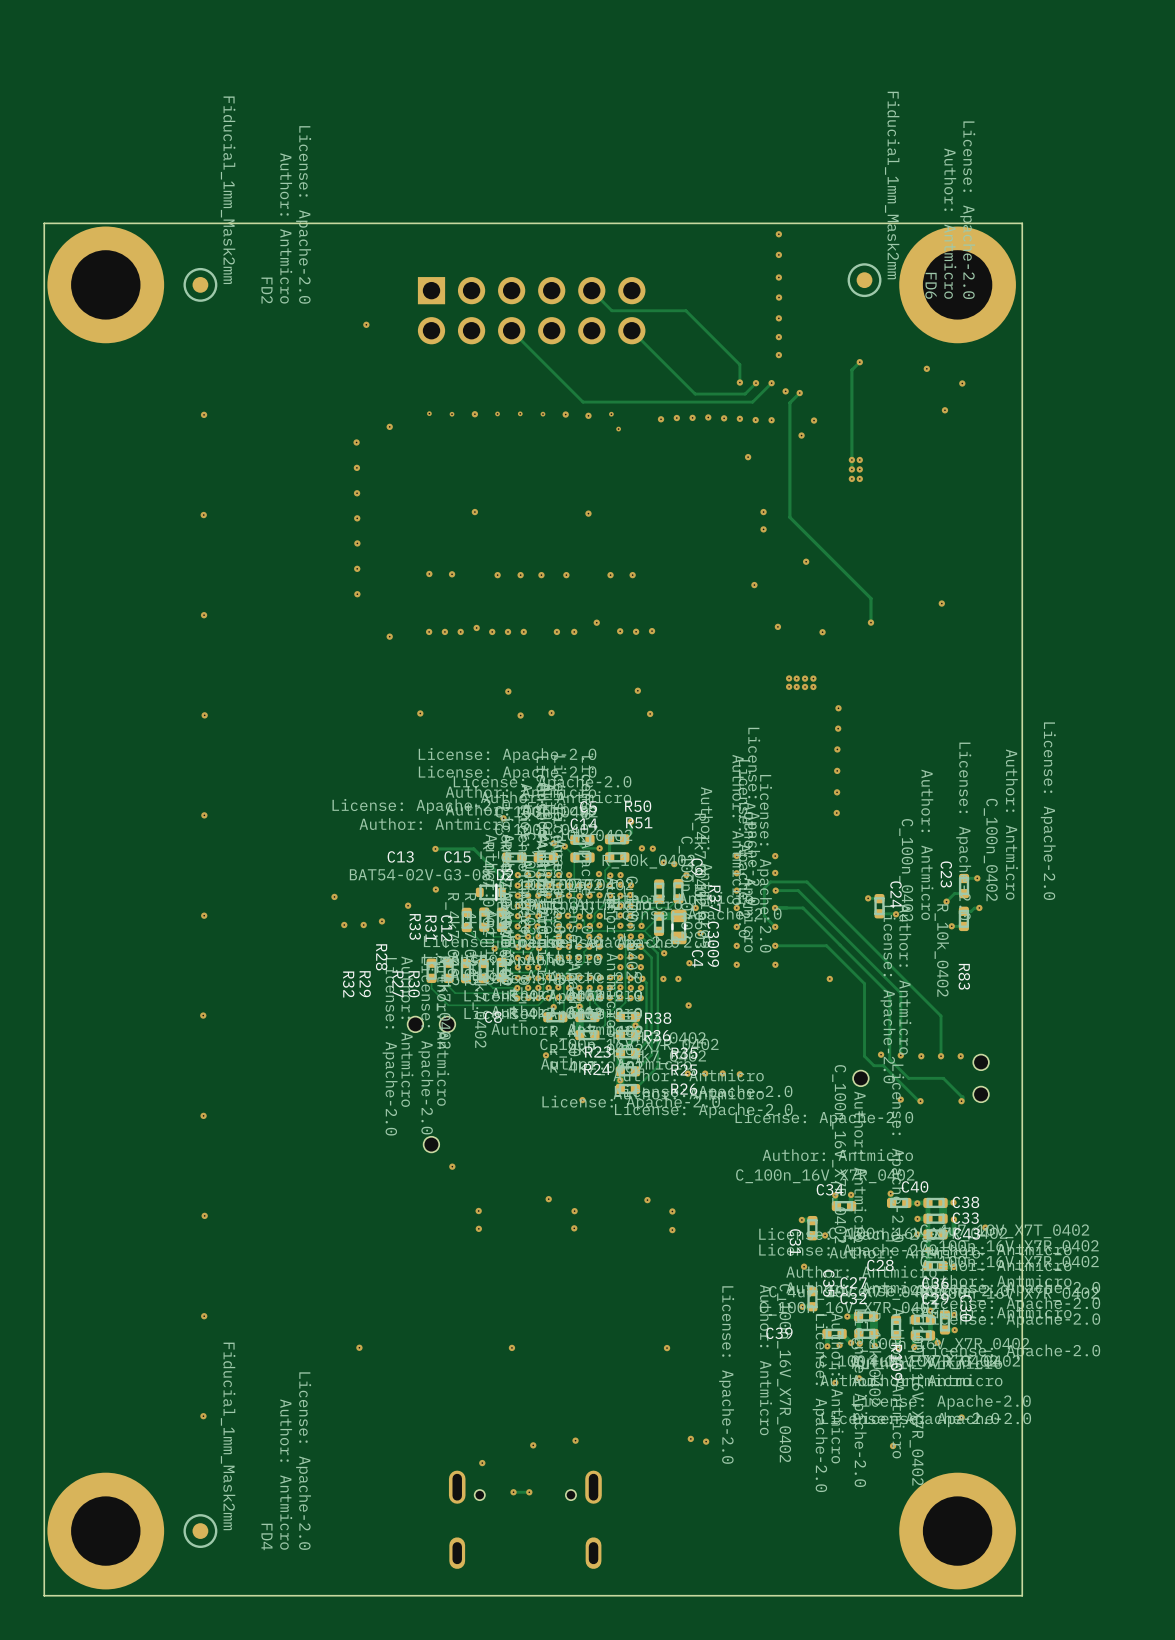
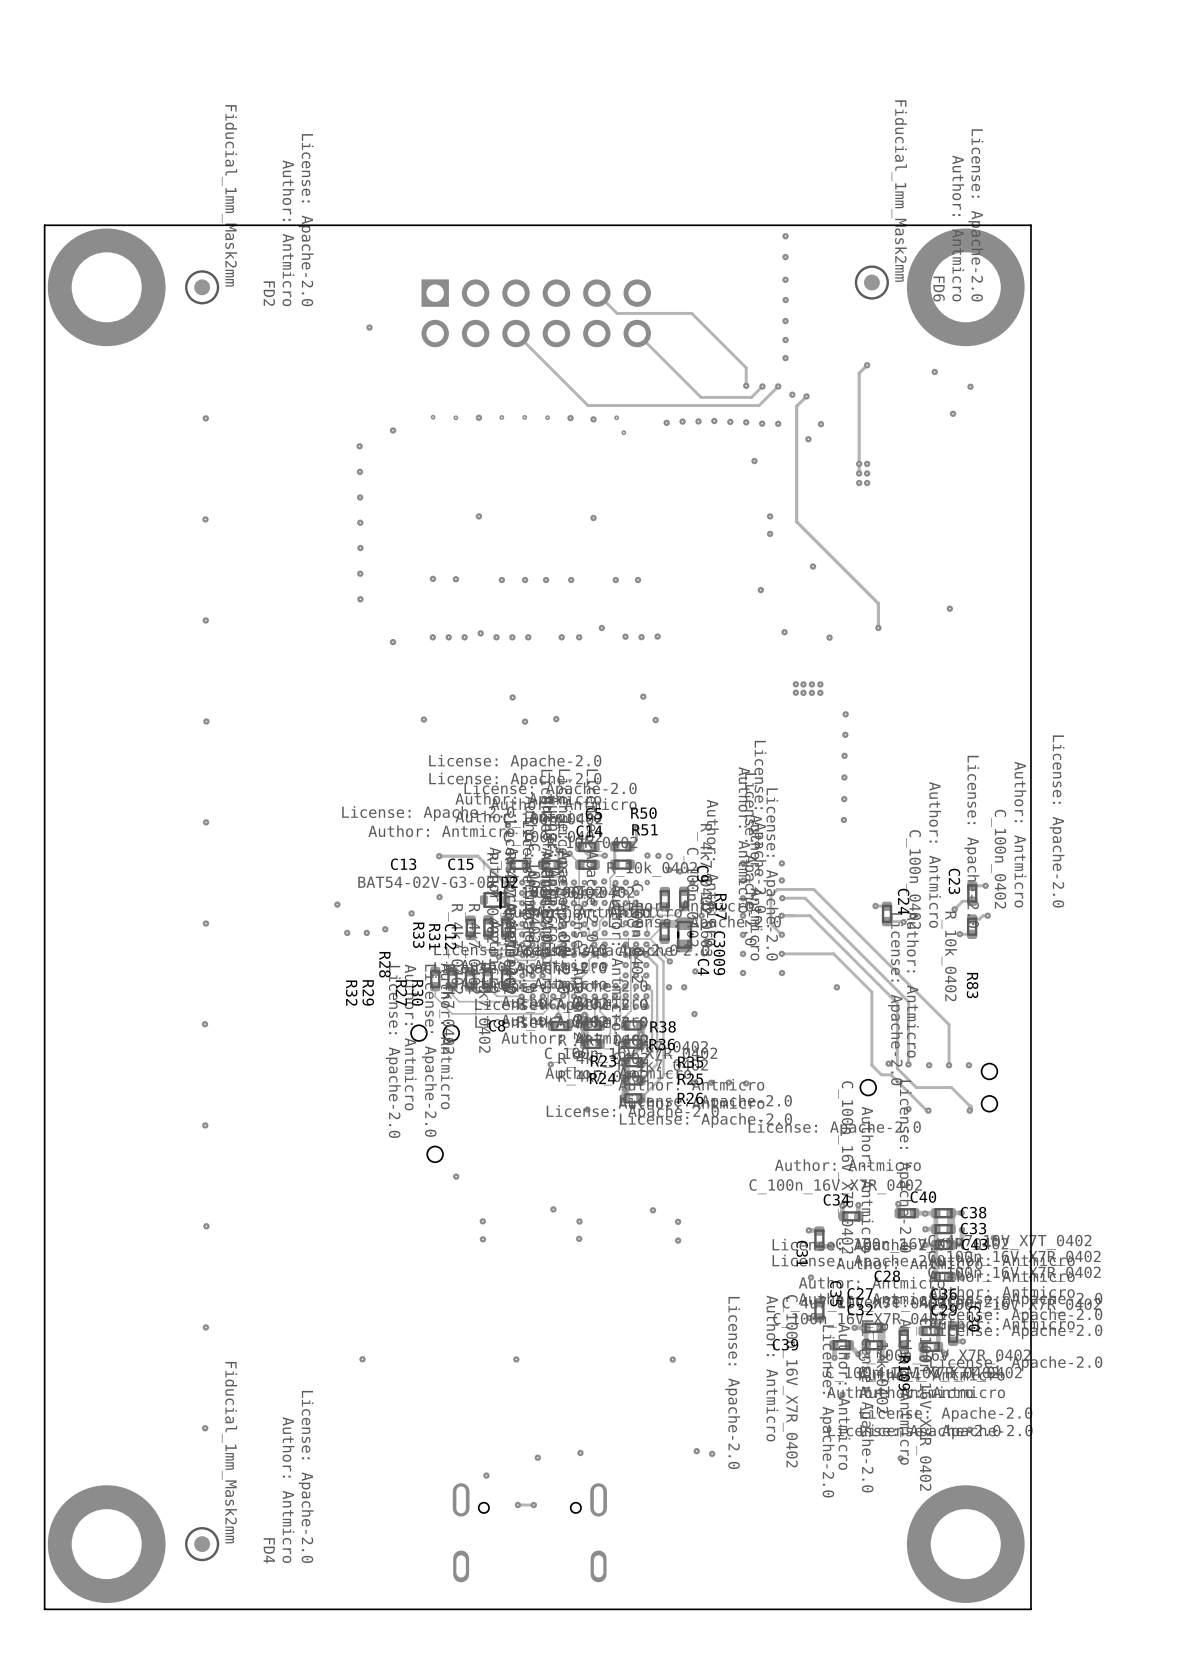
via: none -> (669, 856)
via: none -> (584, 882)
via: none -> (594, 882)
via: none -> (636, 882)
via: none -> (647, 882)

